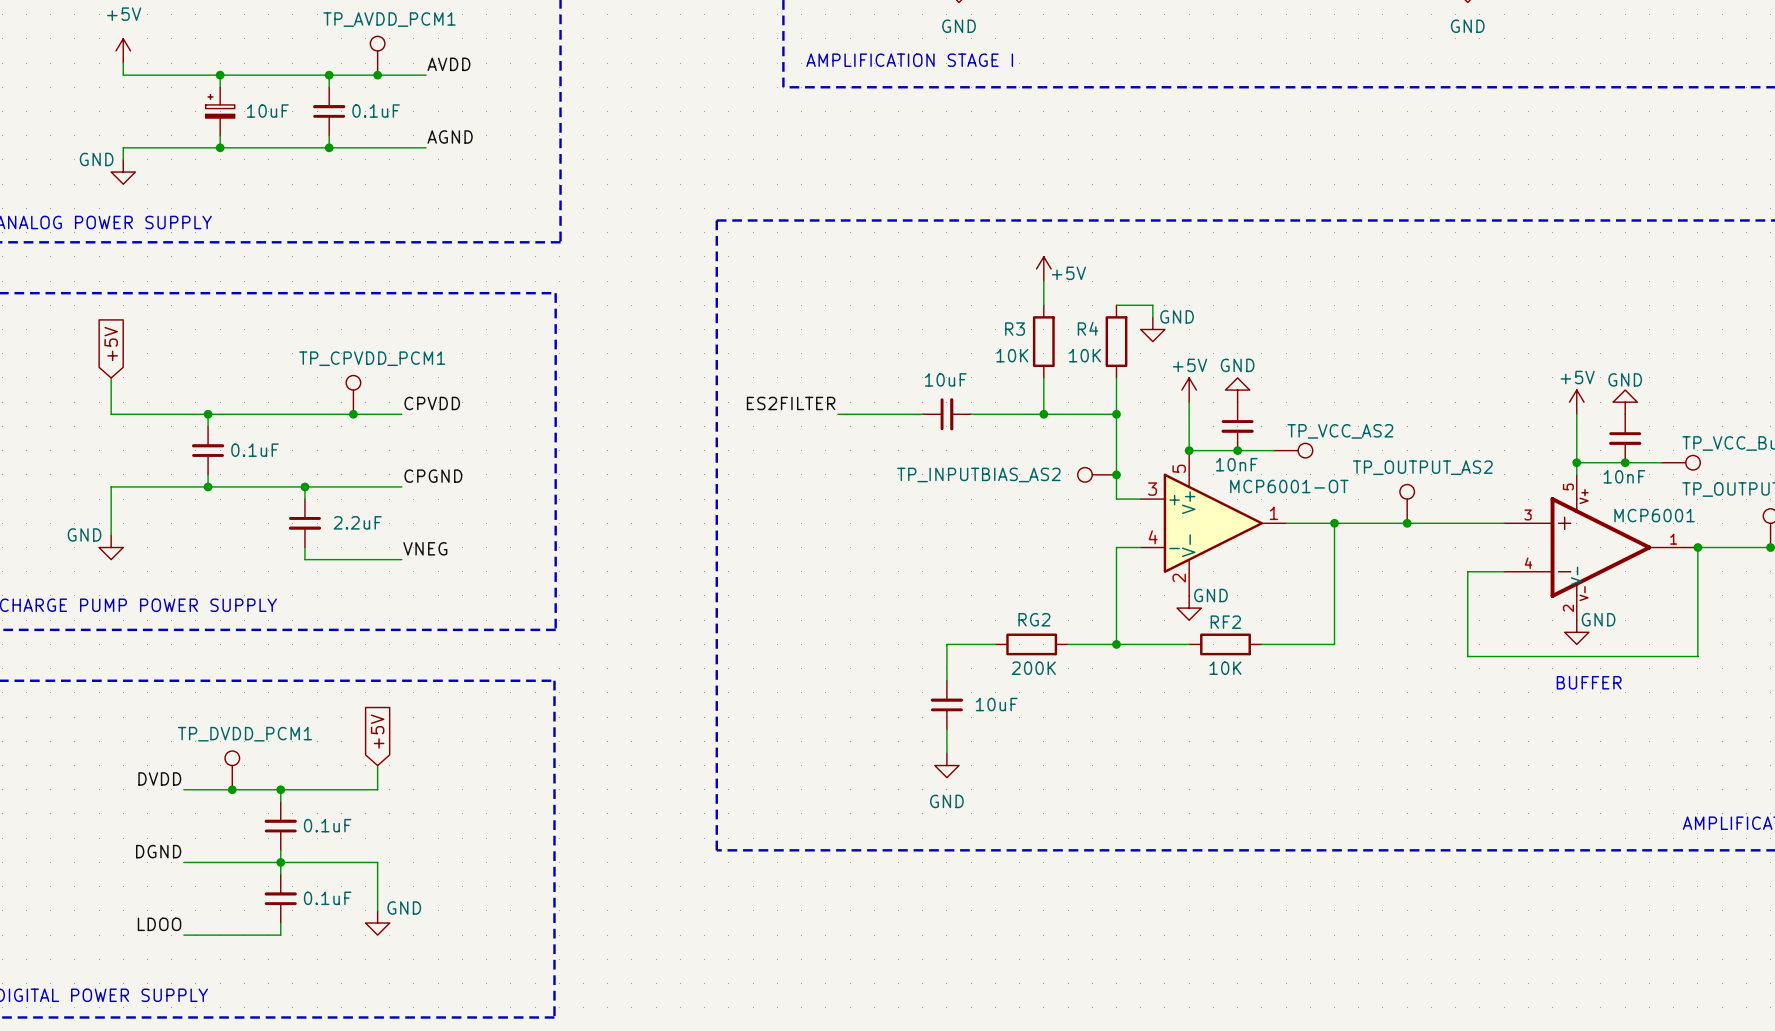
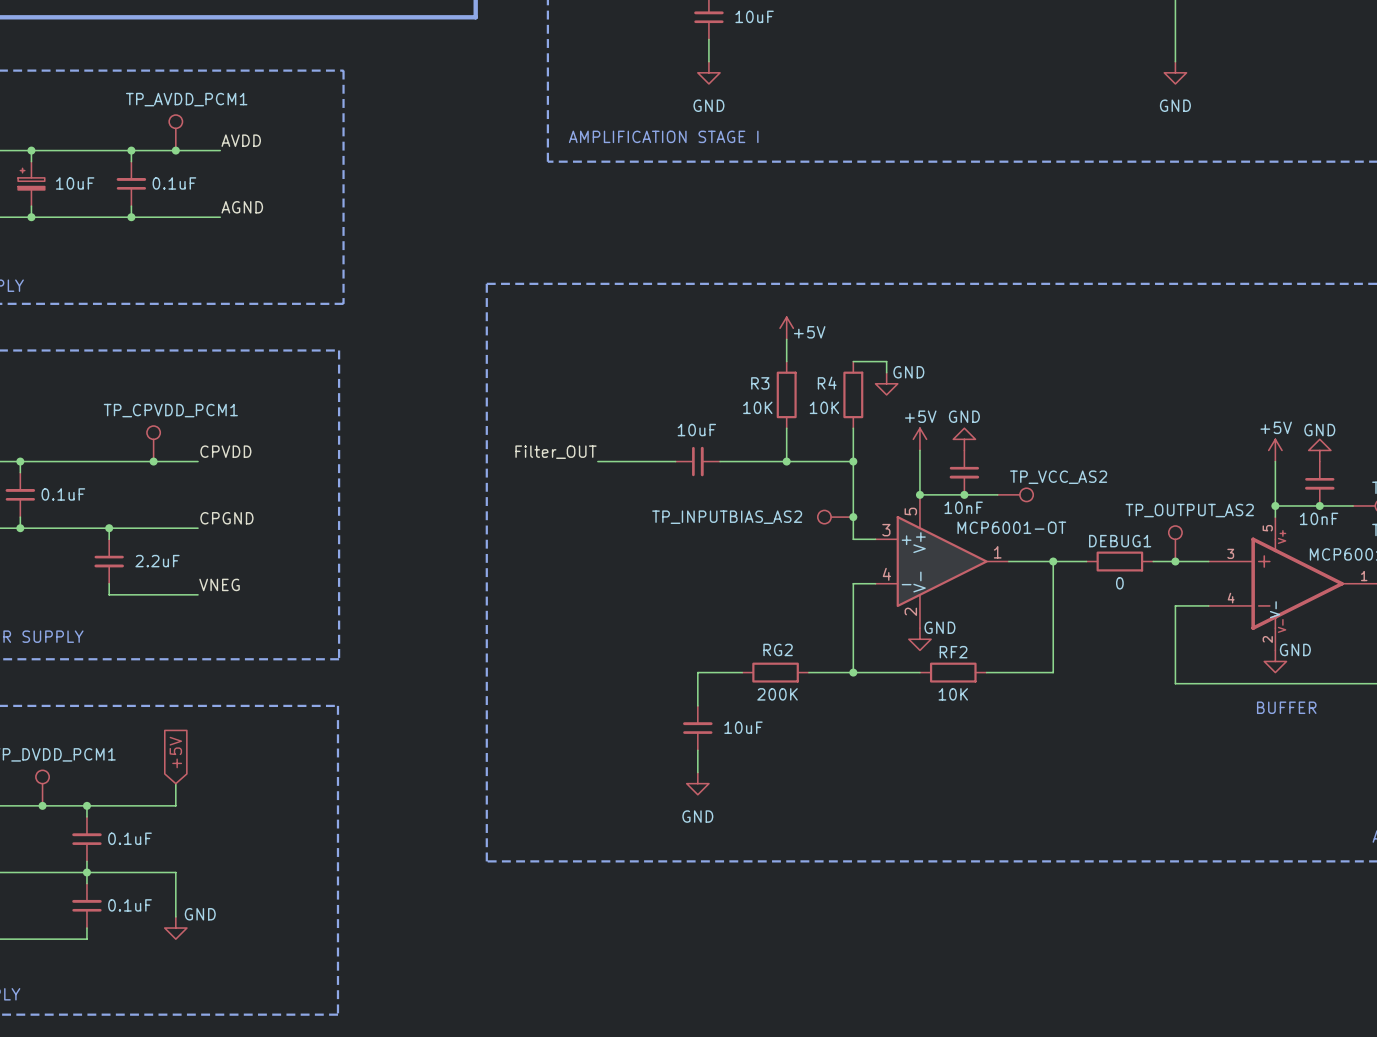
label: ES2FILTER (791, 403) -> Filter_OUT (556, 452)
TP_OUTPUT_AS2 position: (1407, 503) -> (1175, 543)
wire: (1370, 523) (1443, 523) -> none
junction: (1407, 523) -> none
DEBUG1: none -> 0 (1119, 561)
junction: none -> (1175, 561)

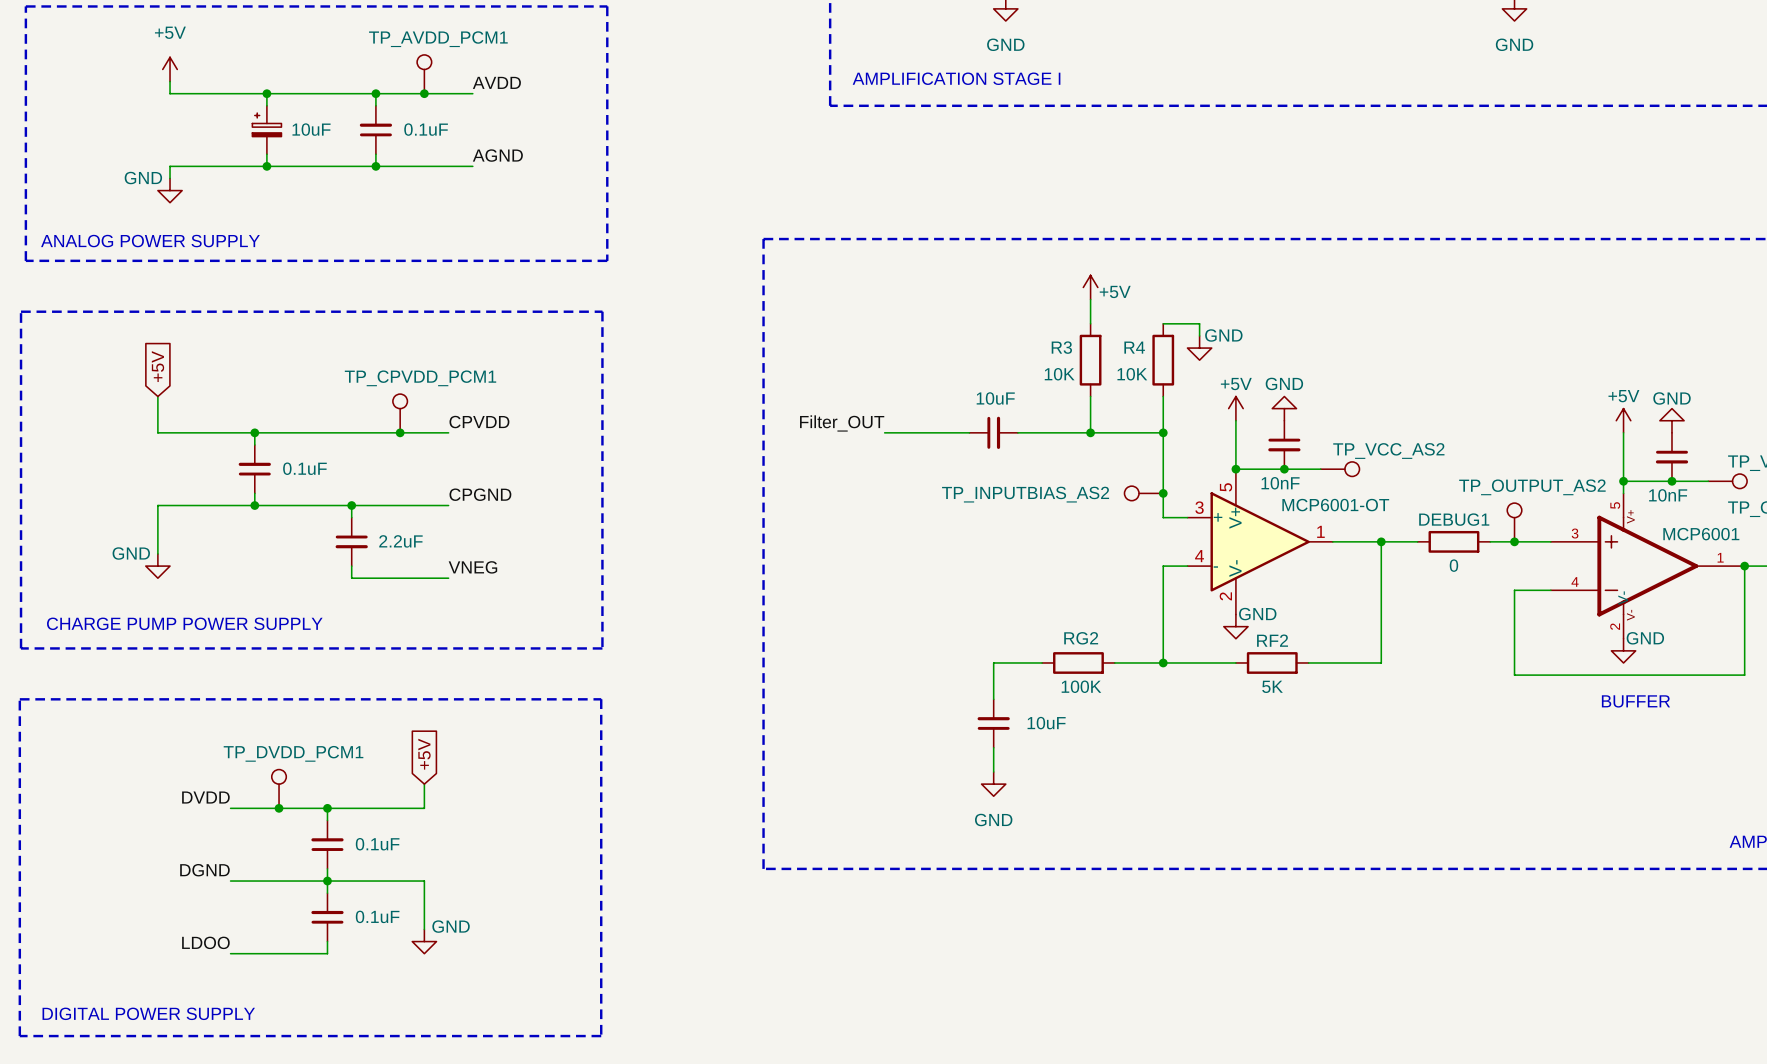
RG2 value: 200K (777, 694) -> 100K (1081, 686)
RF2 value: 10K (953, 694) -> 5K (1272, 686)

